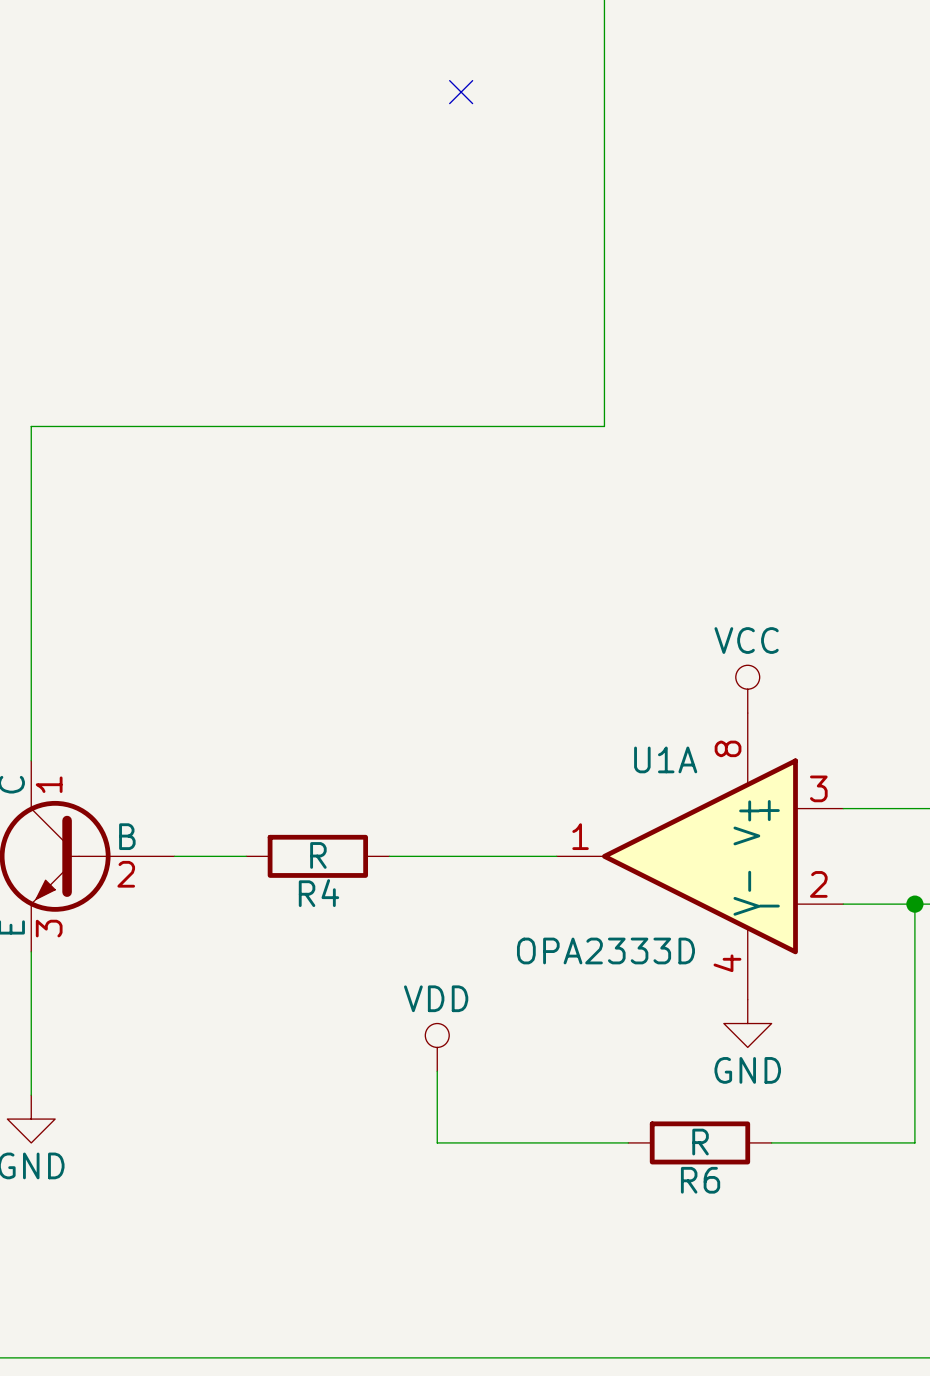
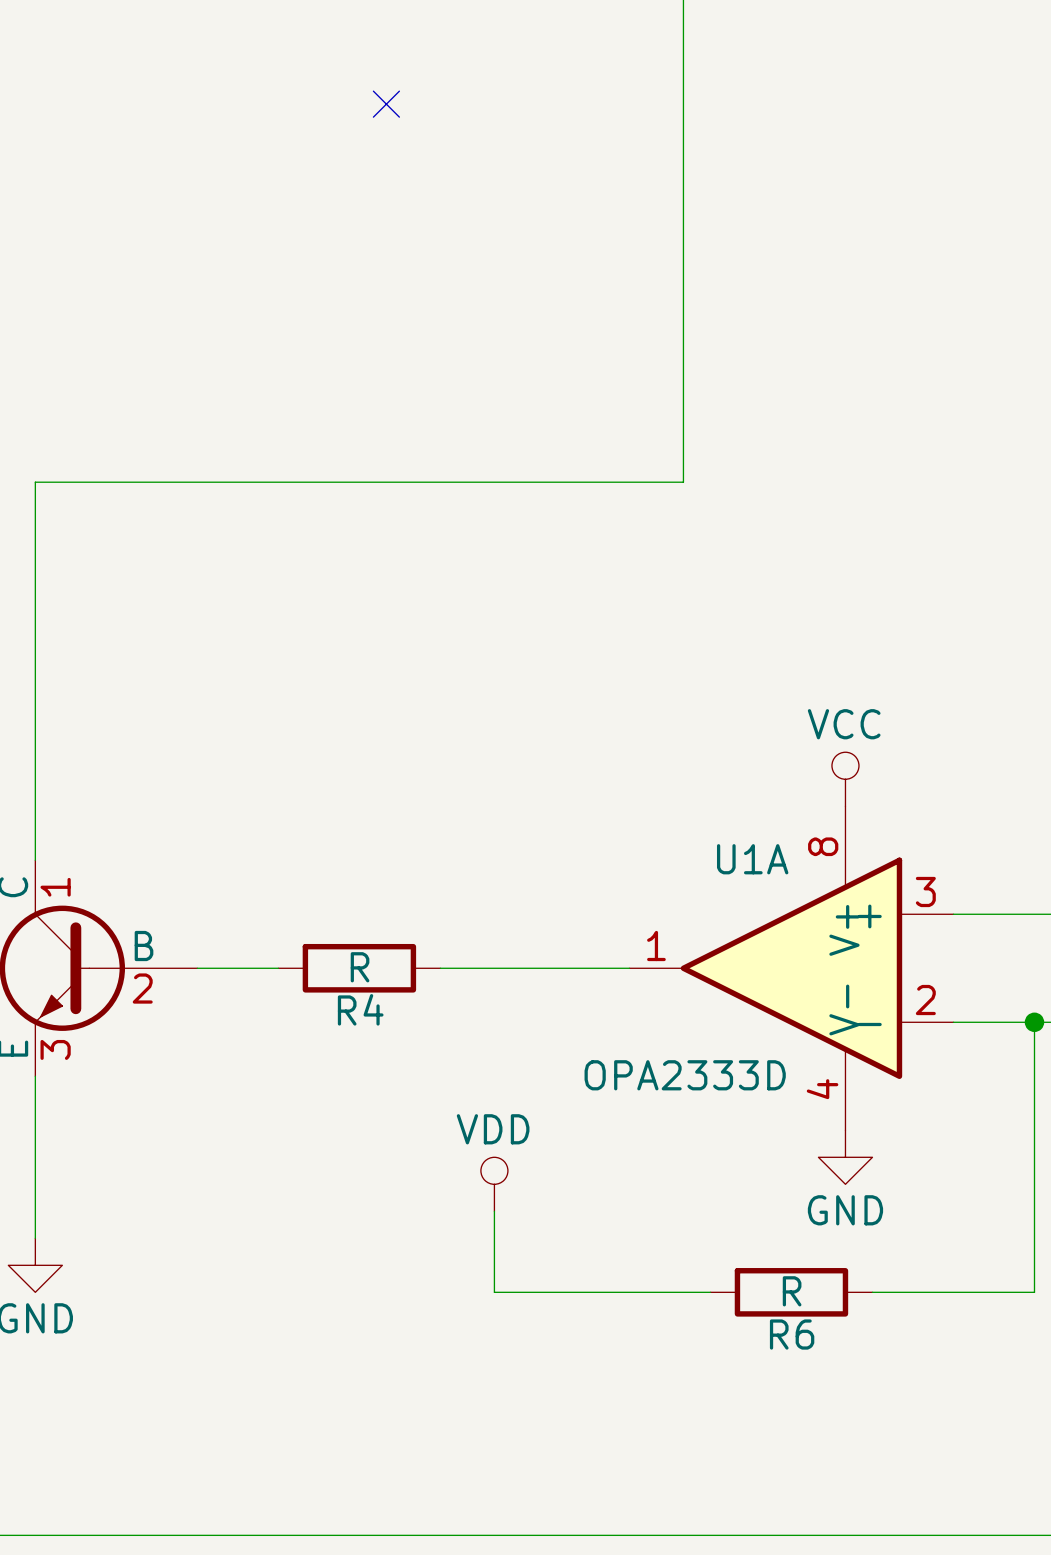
no-connect mark: none -> (386, 104)
no-connect mark: (461, 92) -> none

